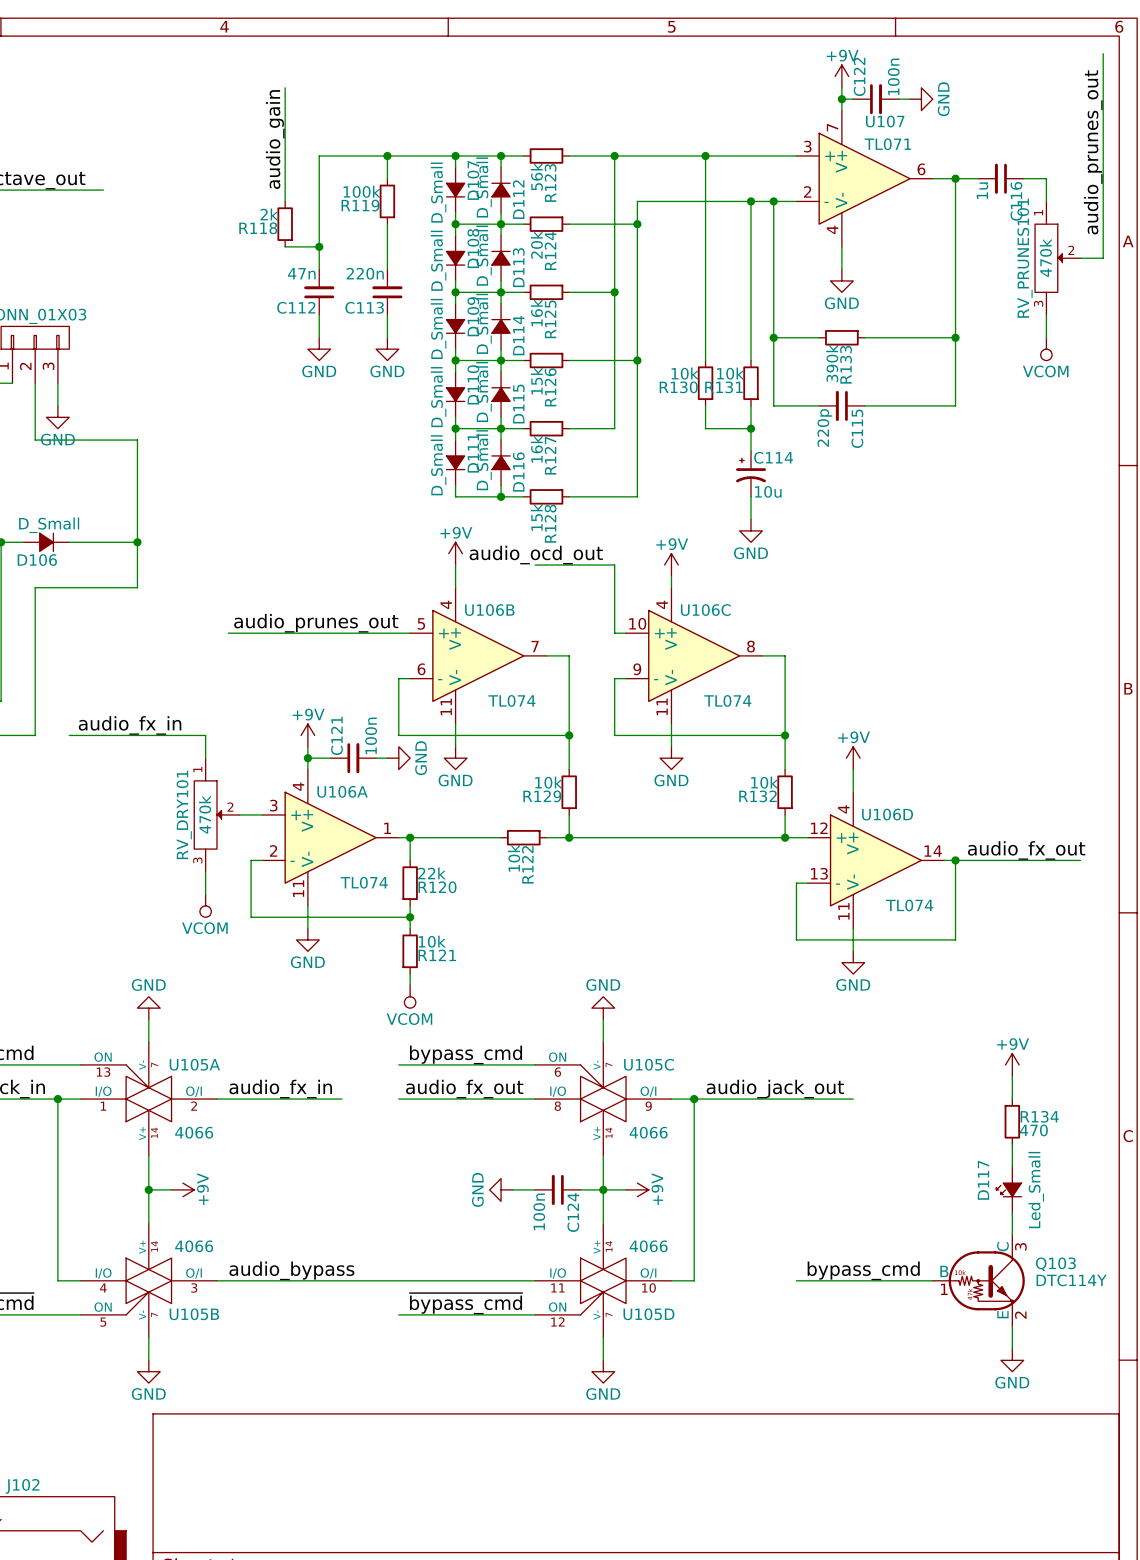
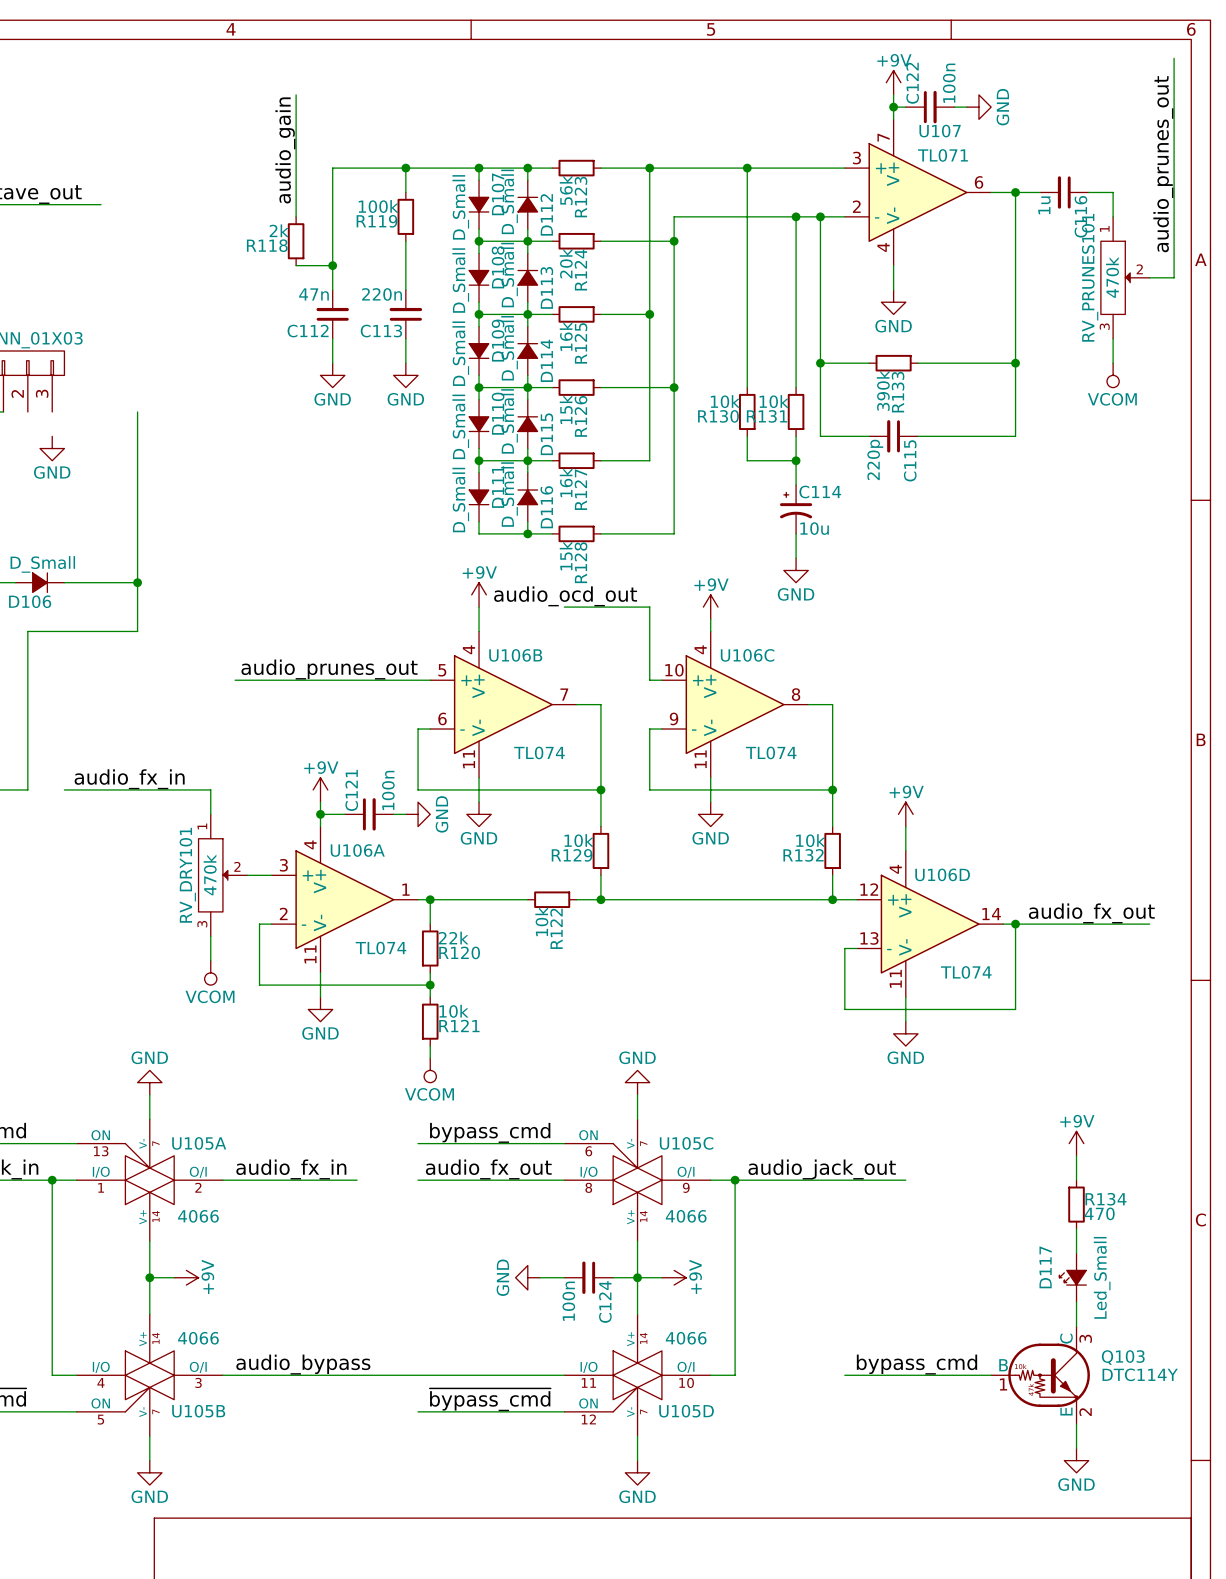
wire: (35, 383) (35, 440) (137, 440) -> (137, 411) (137, 472)
wire: (57, 383) (57, 405) -> none

